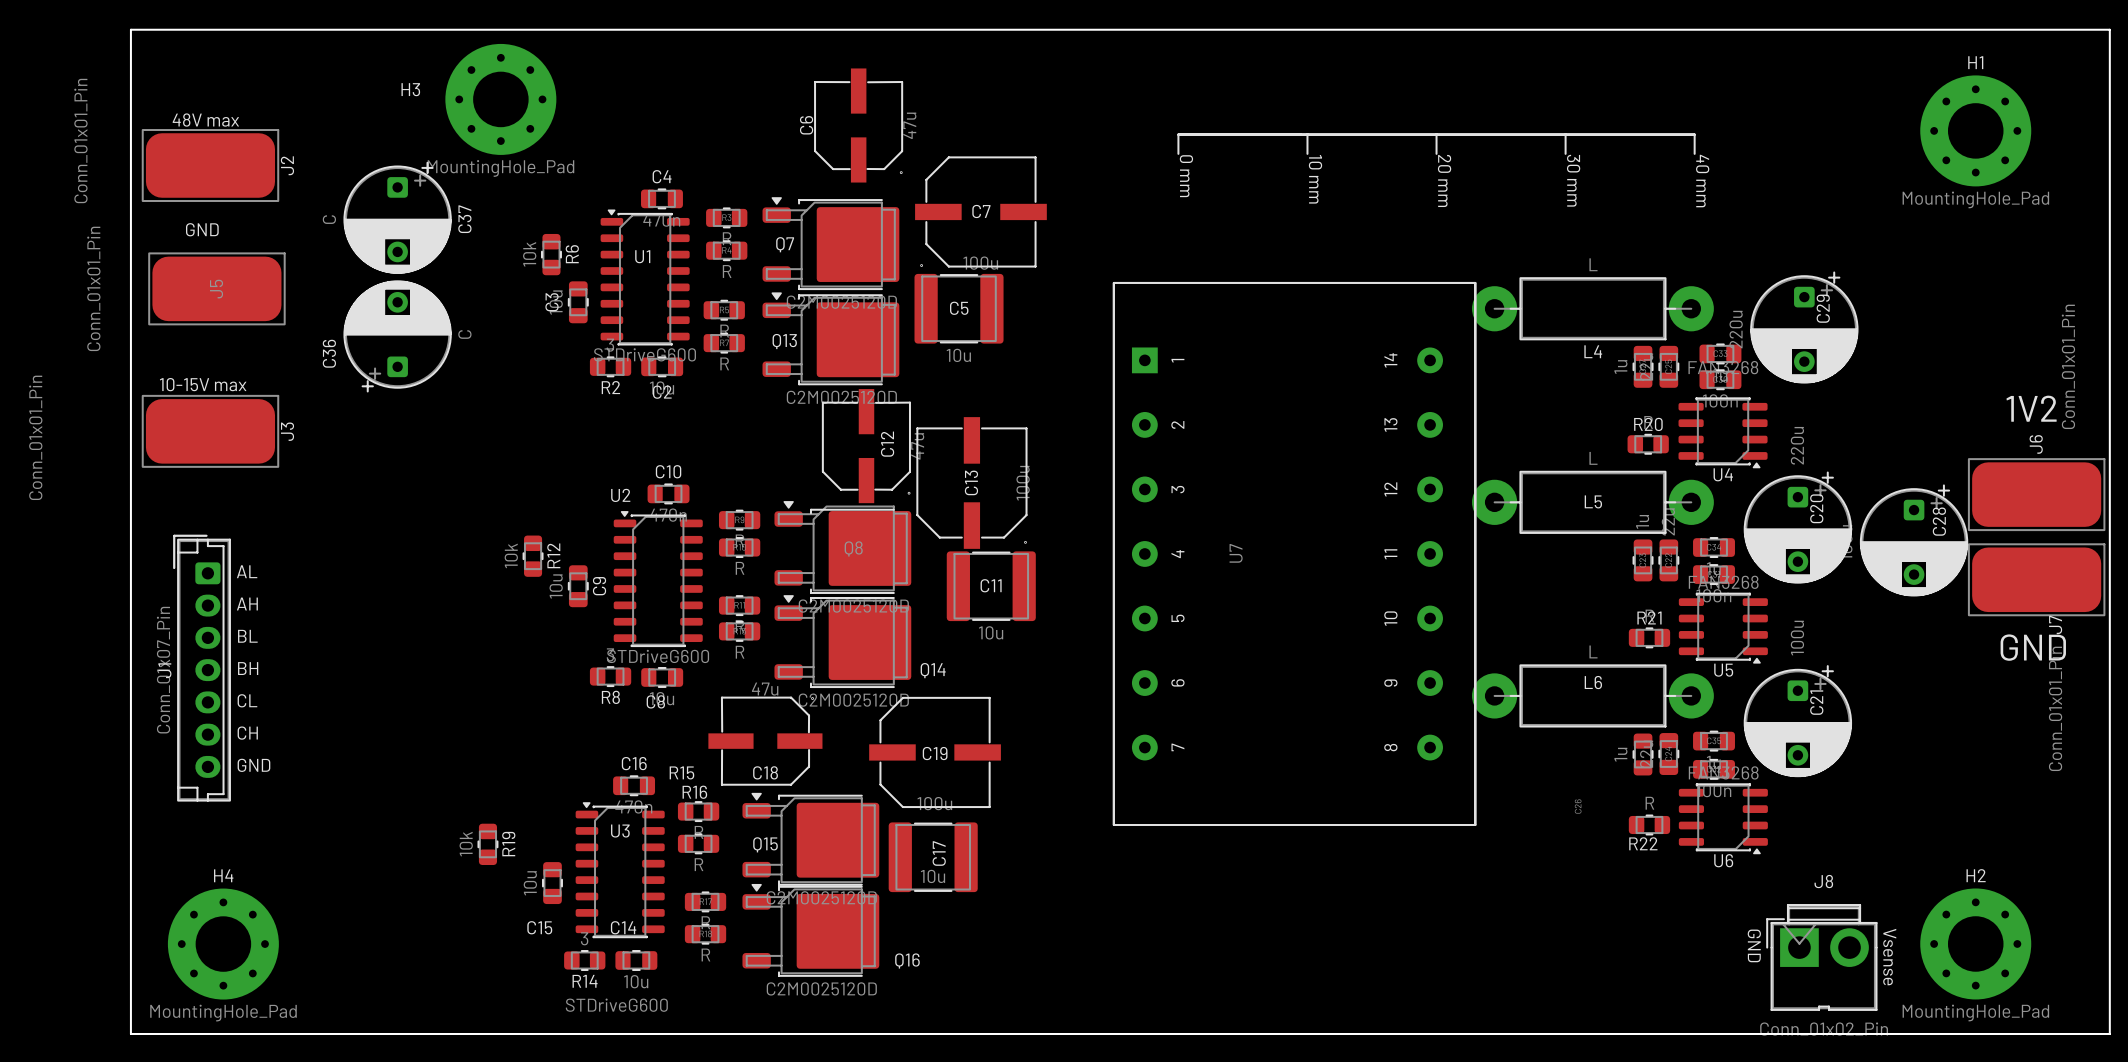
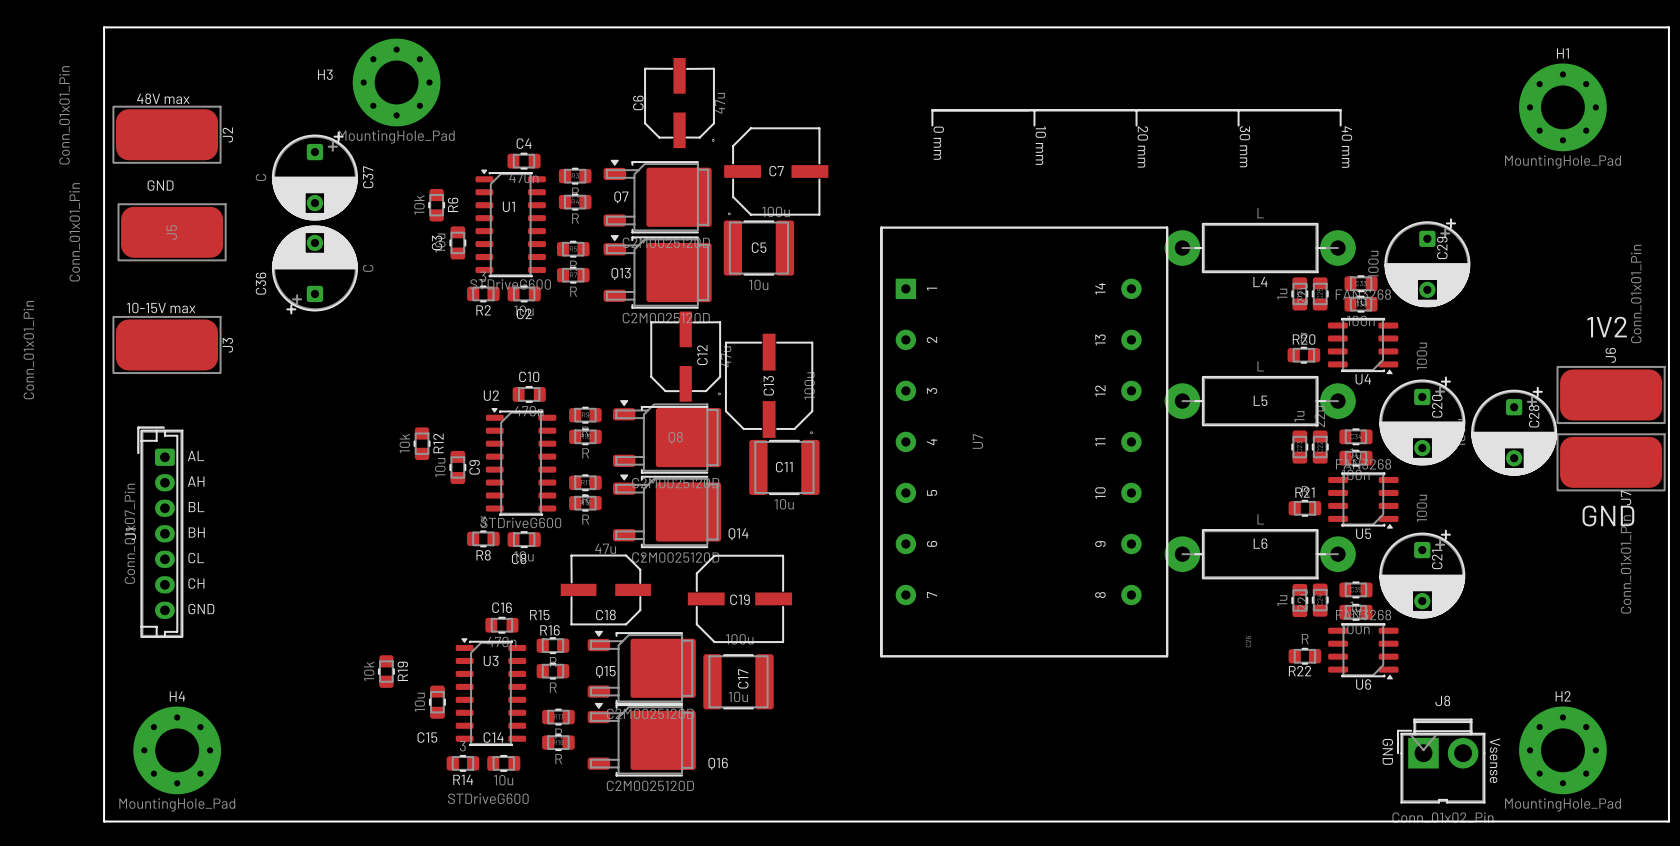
C29 value: 220u (1736, 329) -> 100u (1373, 264)
C20 value: 220u (1797, 445) -> 100u (1421, 356)

